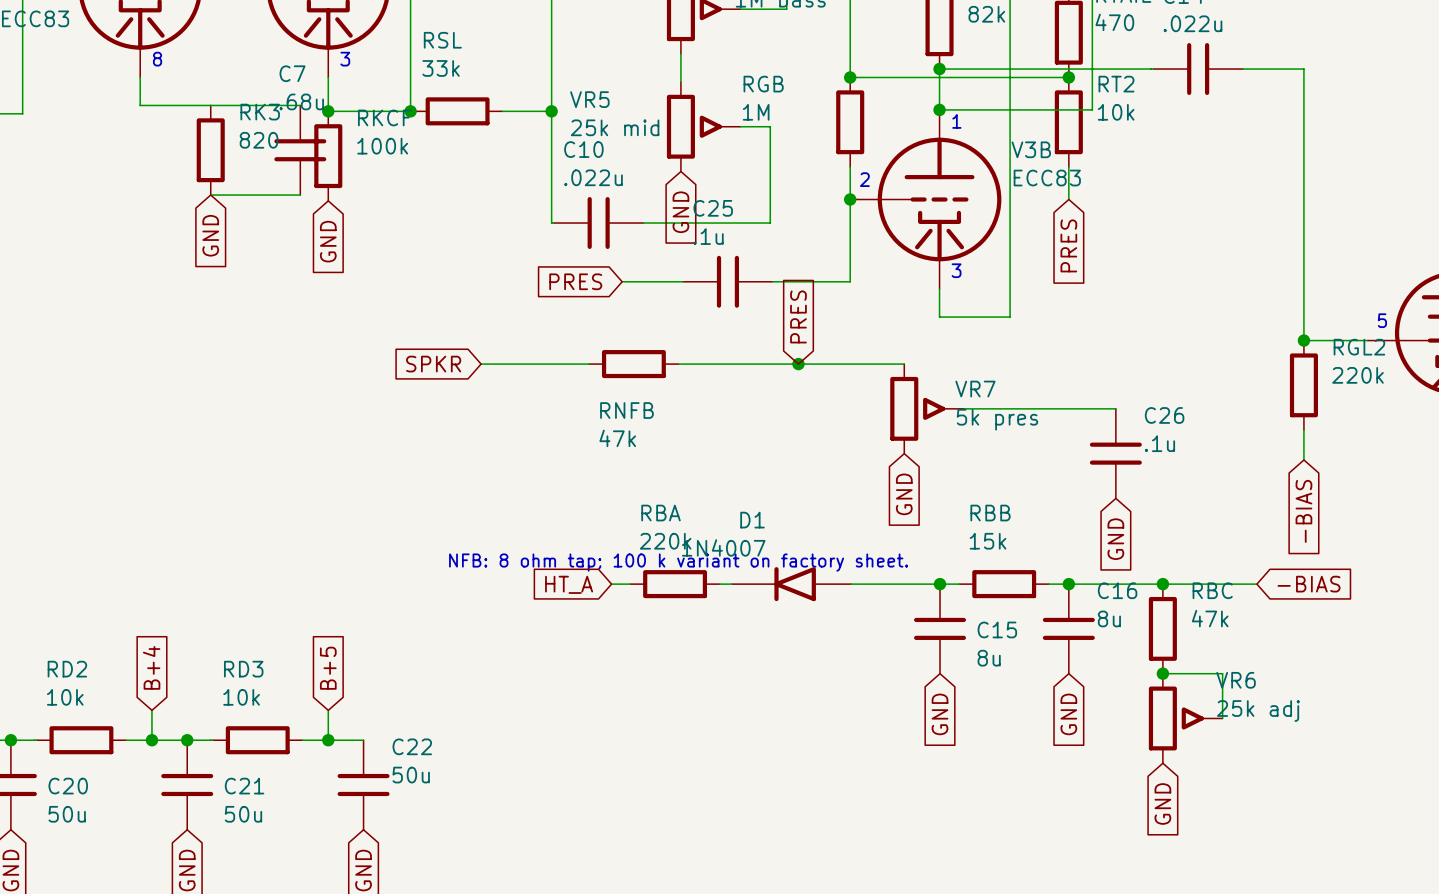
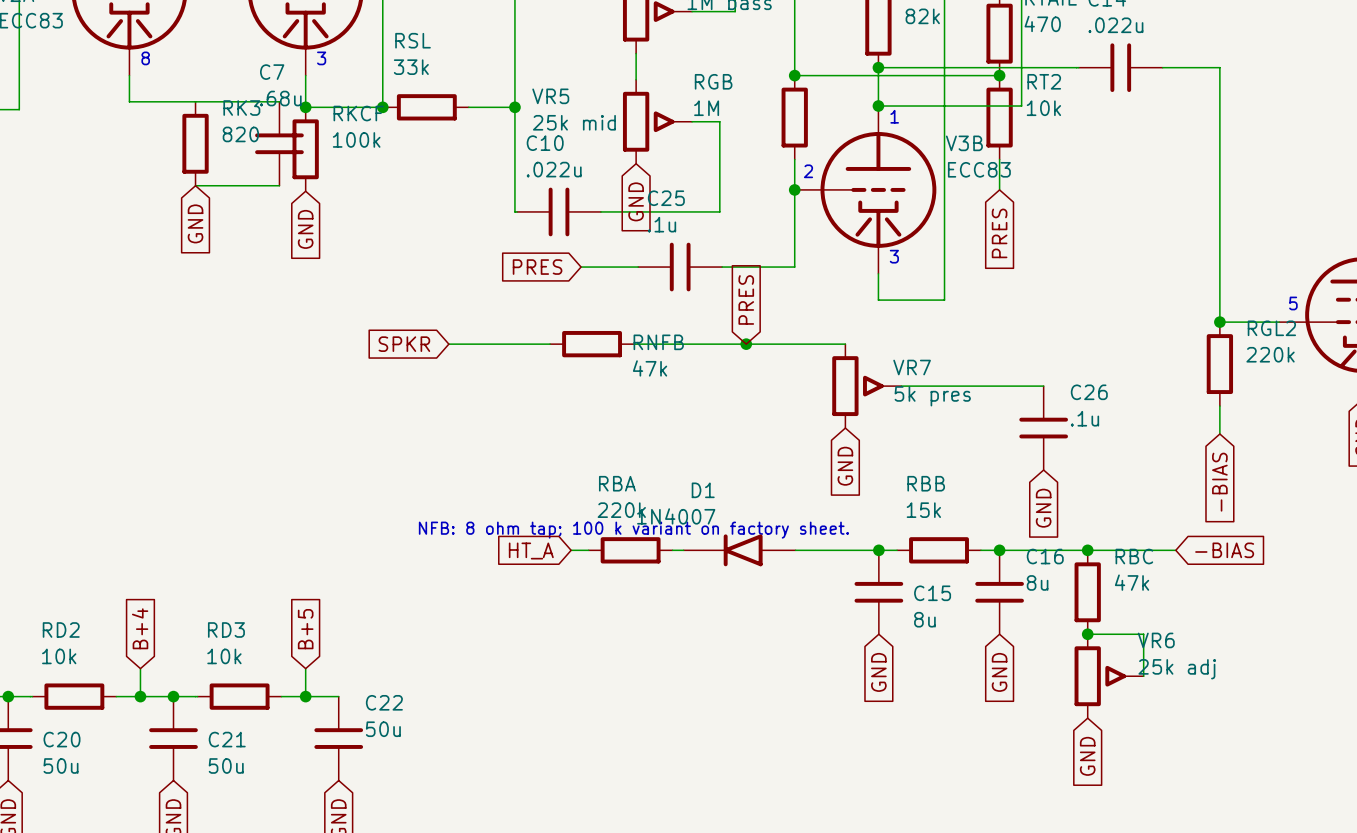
RNFB name position: RNFB (626, 410) -> RNFB (658, 342)
RNFB value position: 47k (617, 438) -> 47k (650, 368)

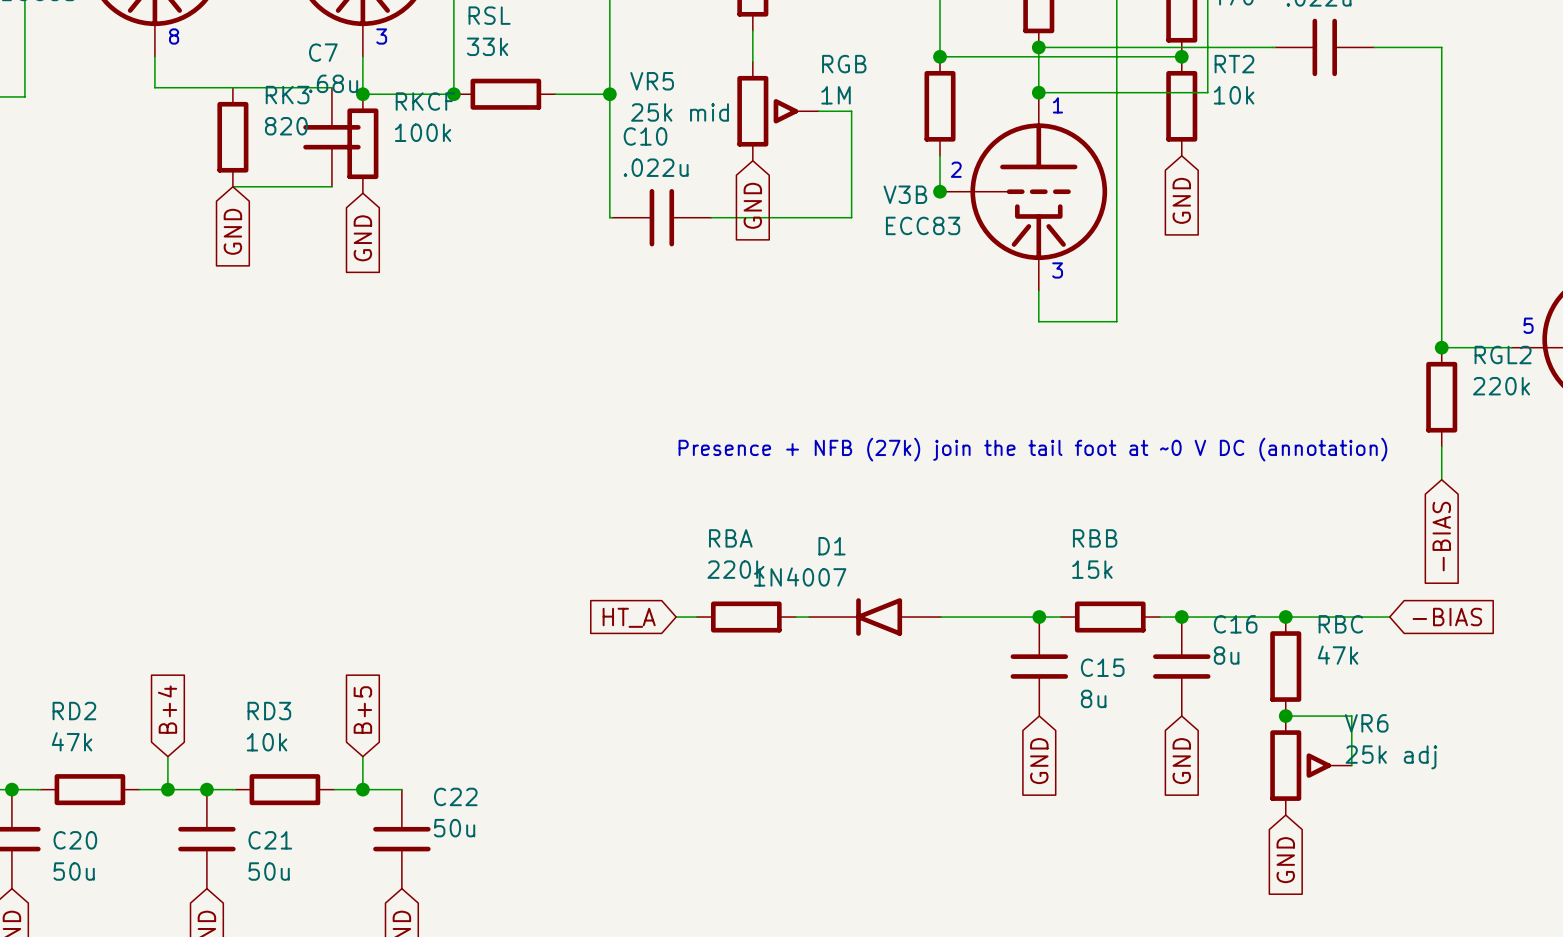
V3B name position: V3B (964, 143) -> V3B (905, 194)
wire: (999, 159) (999, 189) -> none
V3B value position: ECC83 (979, 169) -> ECC83 (923, 225)
wire: (794, 189) (794, 267) (722, 267) -> none
global label: none -> GND (1181, 200)
global label: PRES (999, 233) -> none
global label: PRES (537, 267) -> none
wire: (581, 267) (638, 267) -> none
C25: .1u (680, 267) -> none
global label: PRES (746, 299) -> none
global label: SPKR (404, 344) -> none
wire: (448, 344) (550, 344) -> none
RNFB: 47k (592, 344) -> none
wire: (634, 344) (845, 344) -> none
junction: (746, 344) -> none
VR7: 5k pres (866, 386) -> none
wire: (901, 386) (1043, 386) -> none
text: none -> Presence + NFB (27k) join the tail foot at ~0 V DC (annotation) (1032, 449)
C26: .1u (1043, 428) -> none
global label: GND (845, 466) -> none
global label: GND (1043, 508) -> none
text: NFB: 8 ohm tap; 100 k variant on factory sheet. (633, 530) -> none
RD2 value: 10k (59, 656) -> 47k (72, 741)

